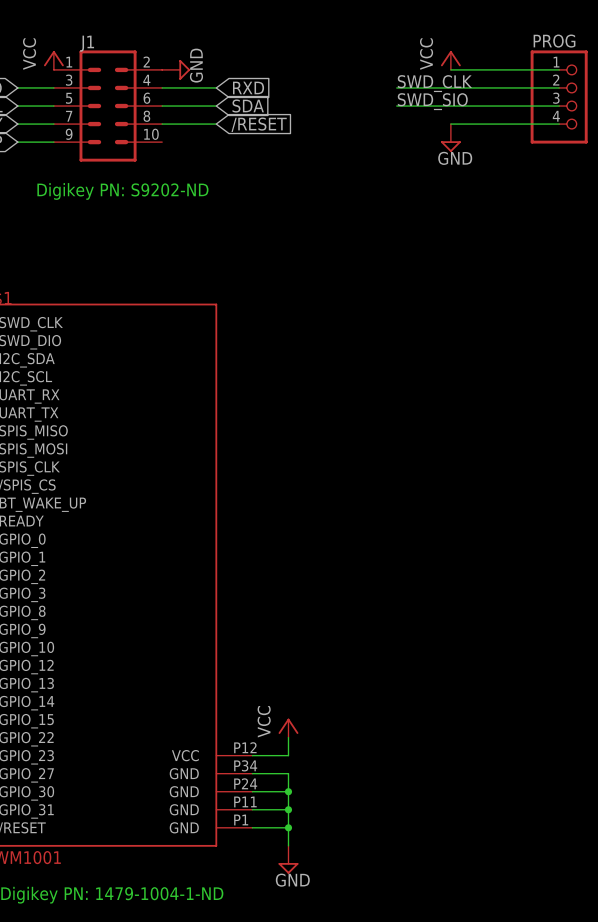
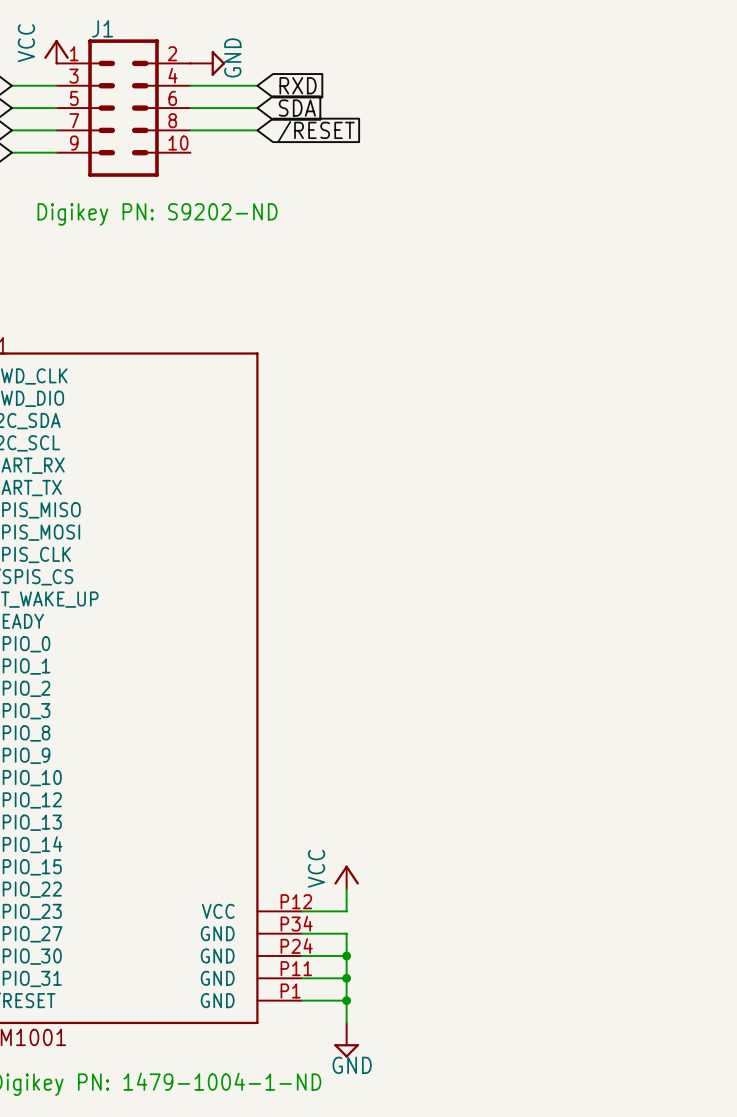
power symbol: VCC (450, 60) -> none
wire: (450, 69) (559, 69) -> none
label: SWD_CLK (434, 83) -> none
wire: (396, 87) (559, 87) -> none
PROG: (559, 96) -> none
label: SWD_SIO (432, 101) -> none
wire: (396, 106) (559, 106) -> none
wire: (450, 124) (559, 124) -> none
power symbol: GND (450, 138) -> none

